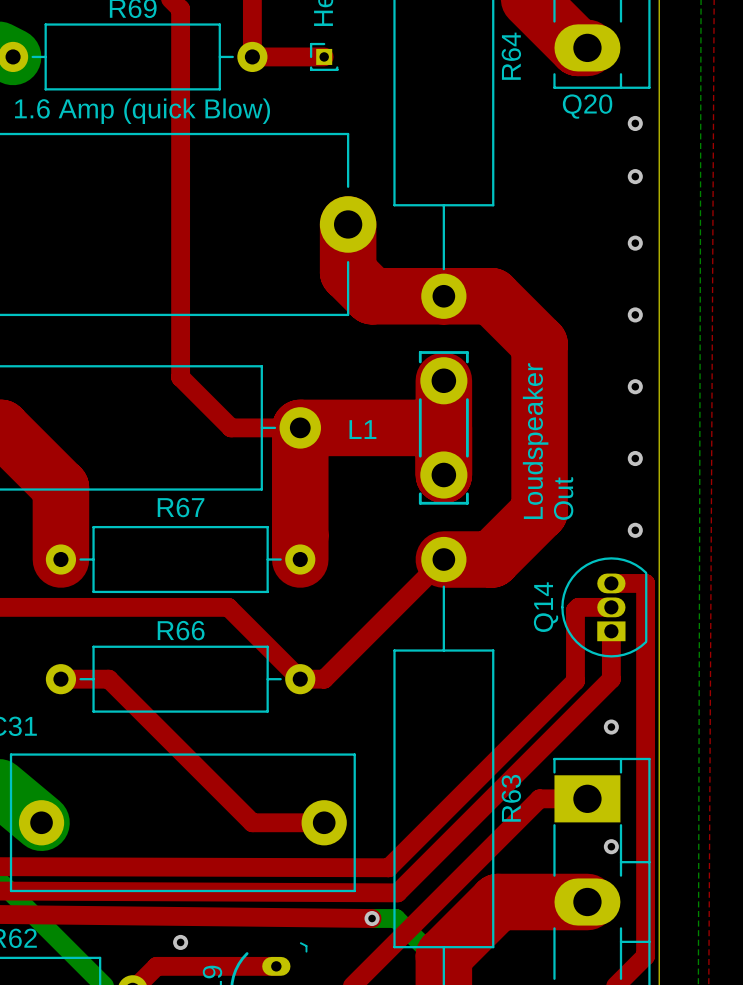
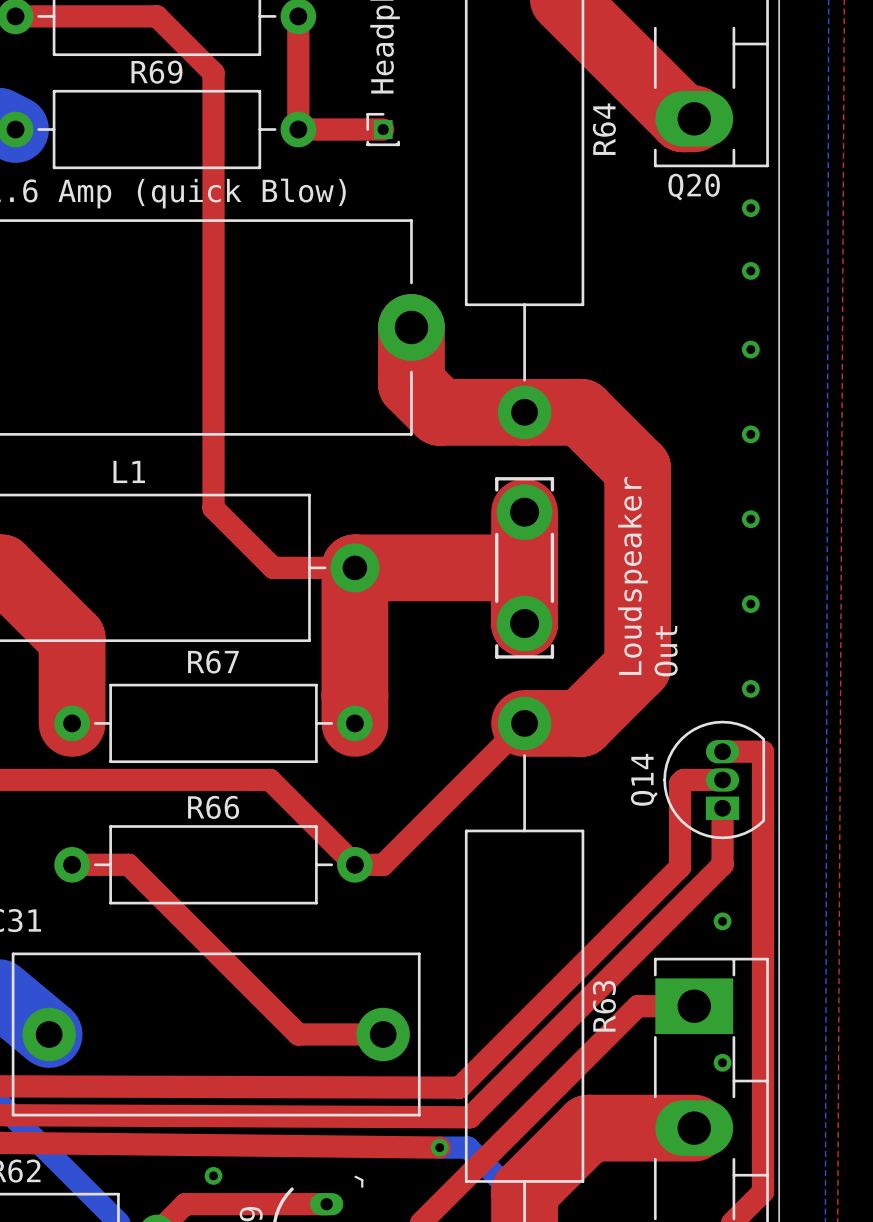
L1 name position: L1 (362, 429) -> L1 (129, 471)

